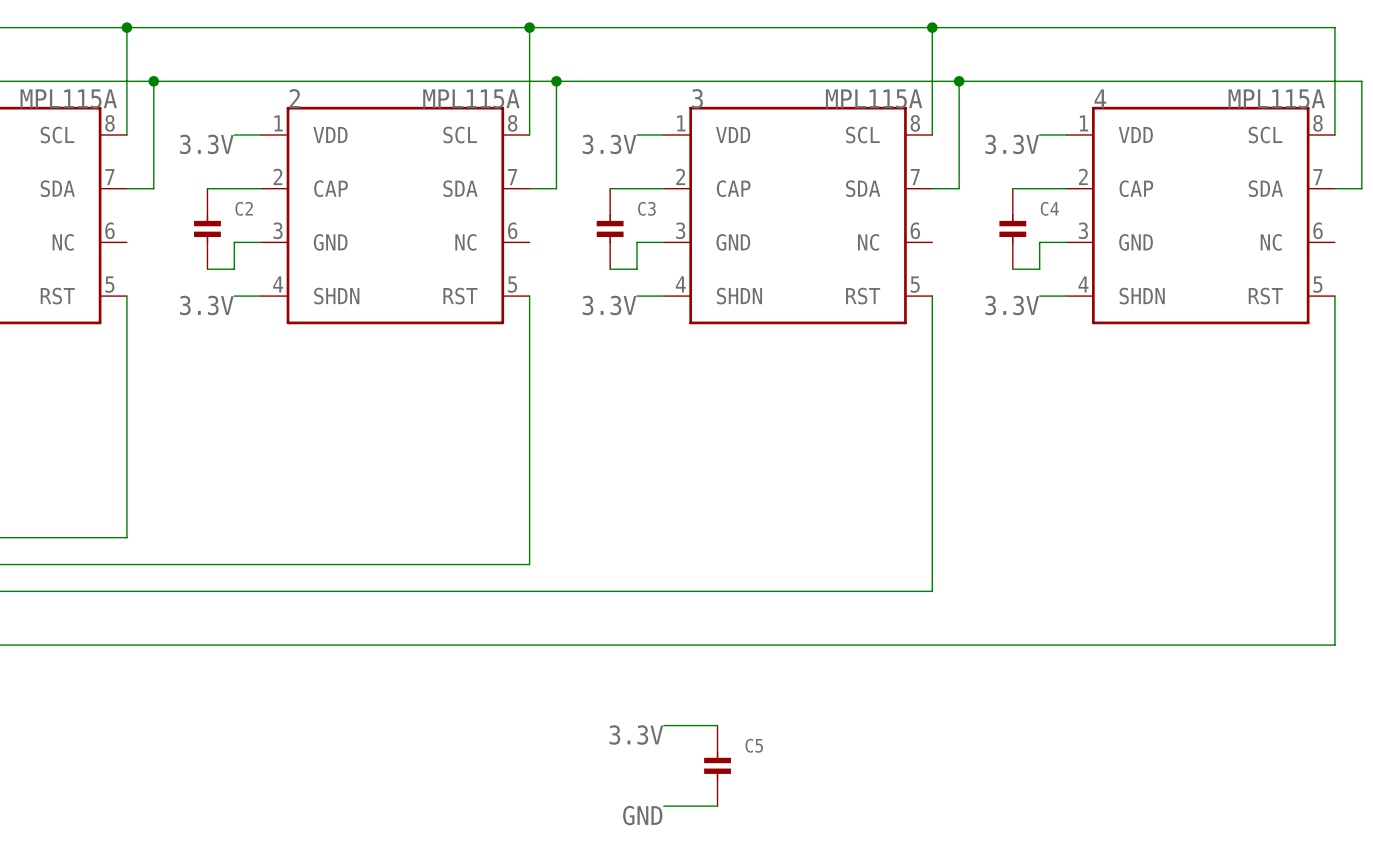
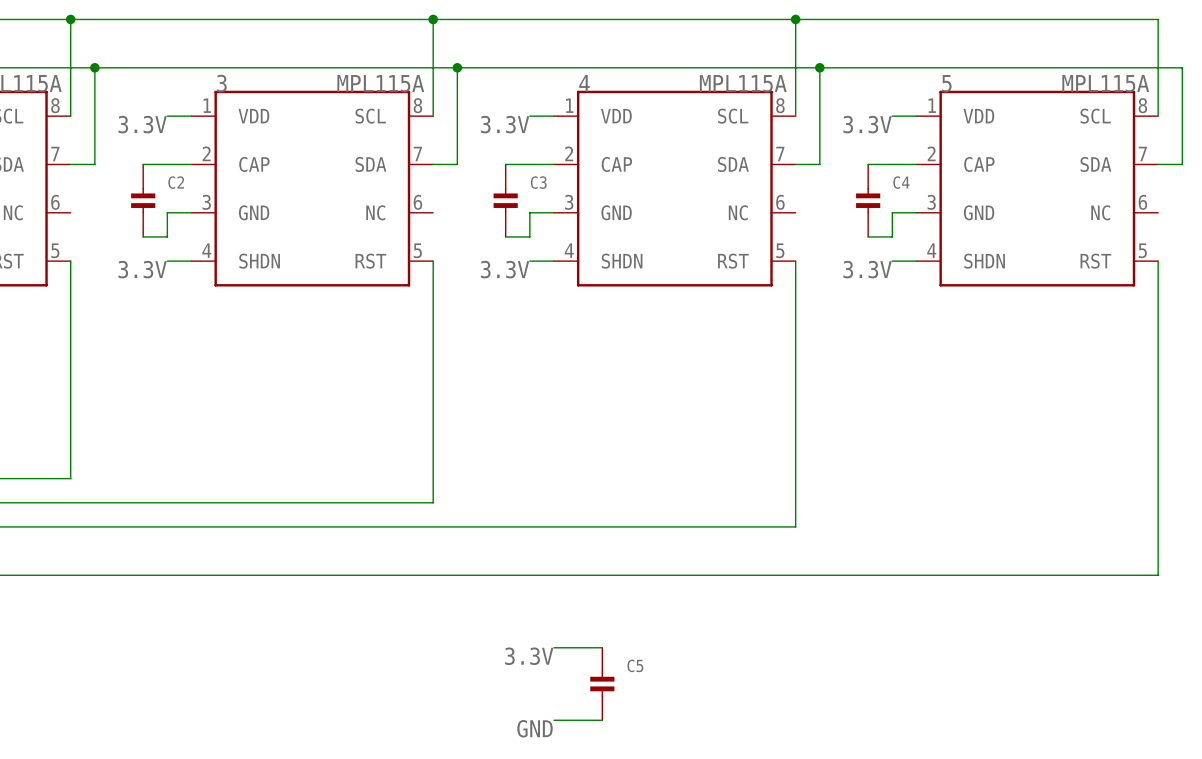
2 name: 2 (294, 98) -> 3 (221, 83)
3 name: 3 (697, 98) -> 4 (584, 83)
4 name: 4 (1100, 98) -> 5 (946, 83)

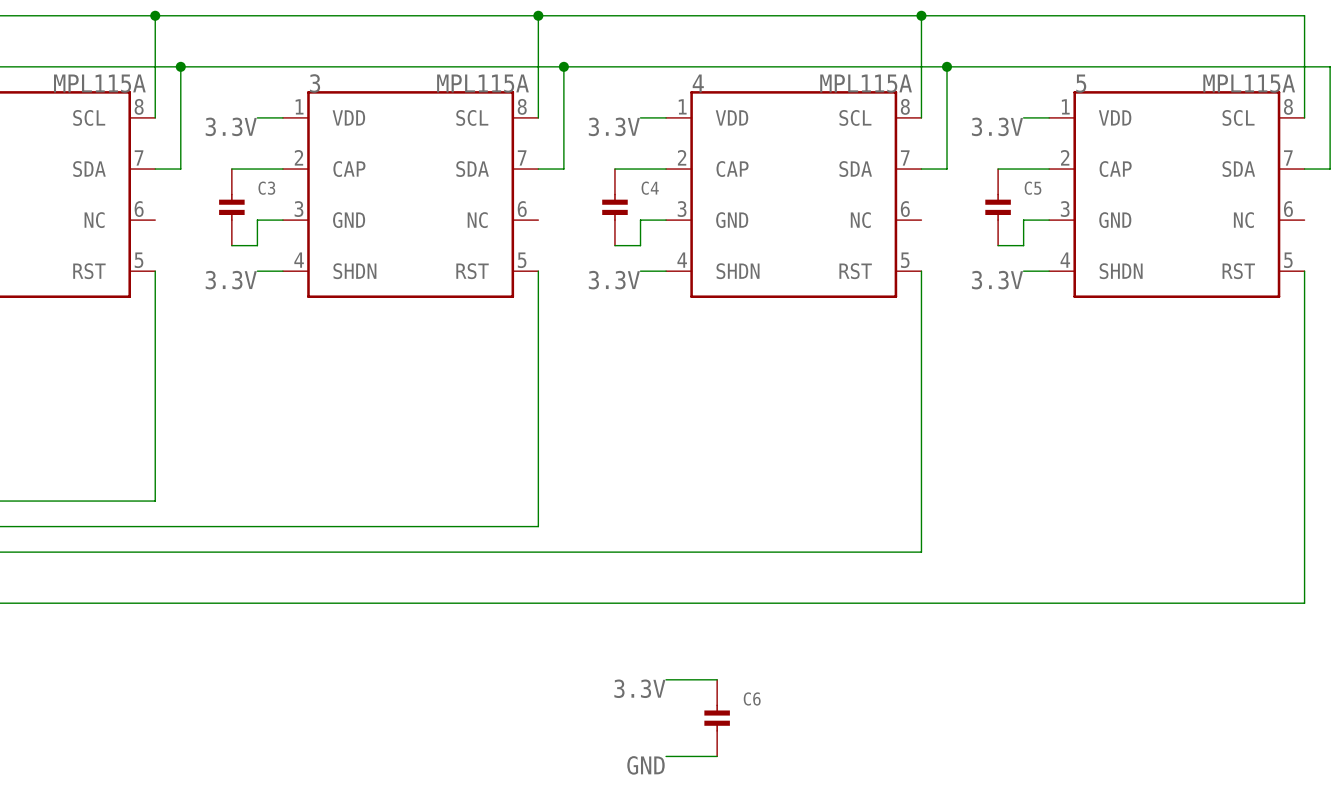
C2 name: C2 (176, 182) -> C3 (266, 188)
C3 name: C3 (538, 182) -> C4 (650, 188)
C4 name: C4 (901, 182) -> C5 (1033, 188)
C5 name: C5 (635, 665) -> C6 (752, 698)

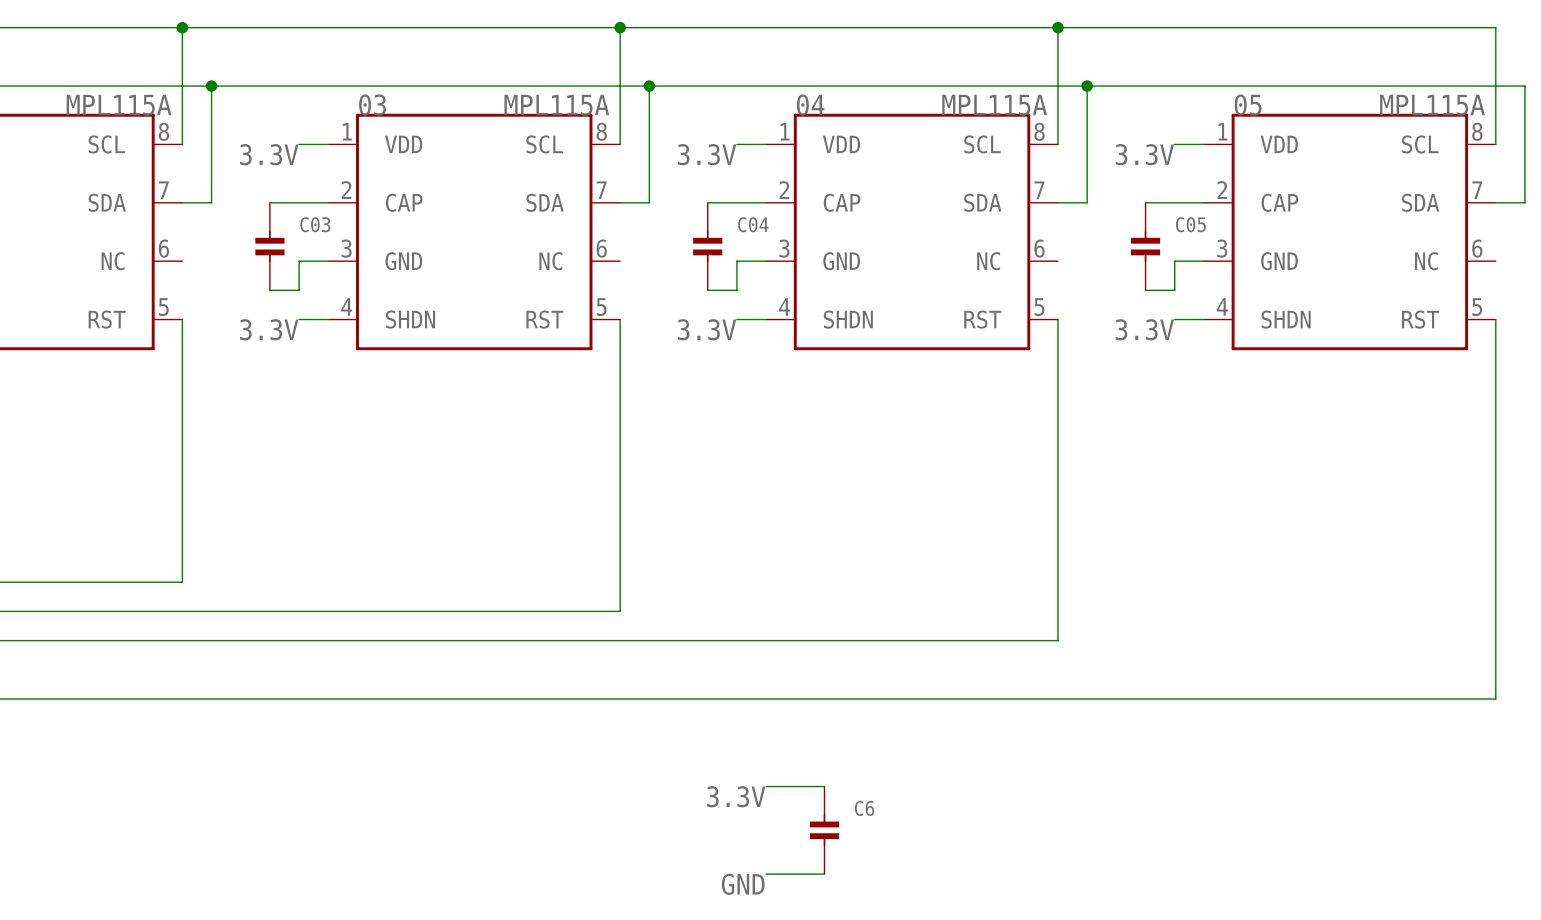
3 name: 3 (315, 83) -> 03 (372, 105)
4 name: 4 (698, 83) -> 04 (810, 105)
5 name: 5 (1081, 83) -> 05 (1248, 105)
C3 name: C3 (266, 188) -> C03 (315, 224)
C4 name: C4 (650, 188) -> C04 (753, 224)
C5 name: C5 (1033, 188) -> C05 (1190, 224)

